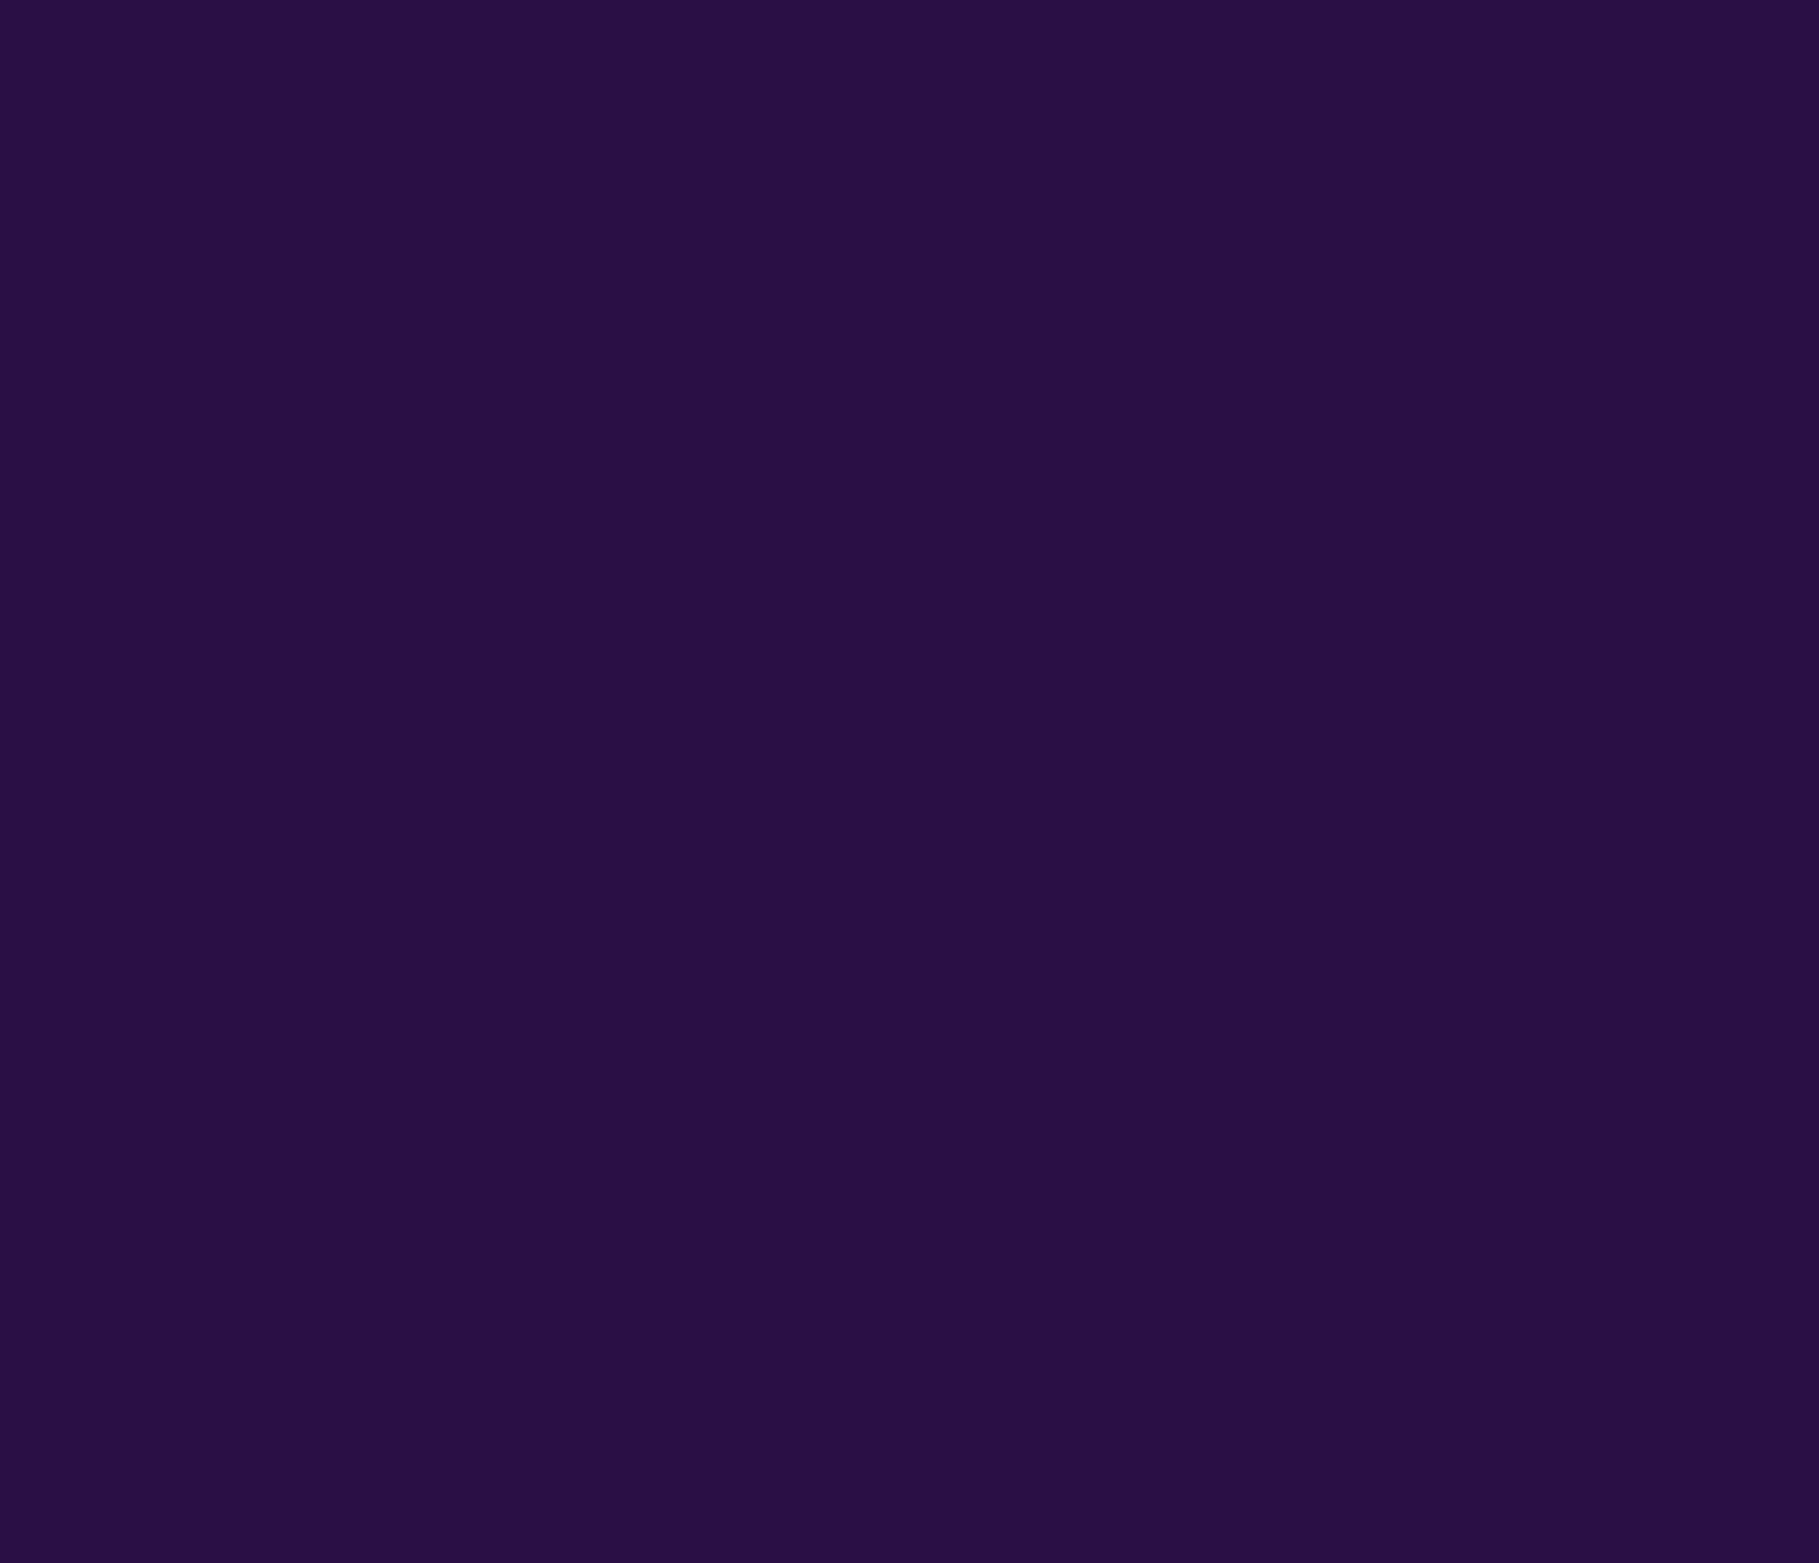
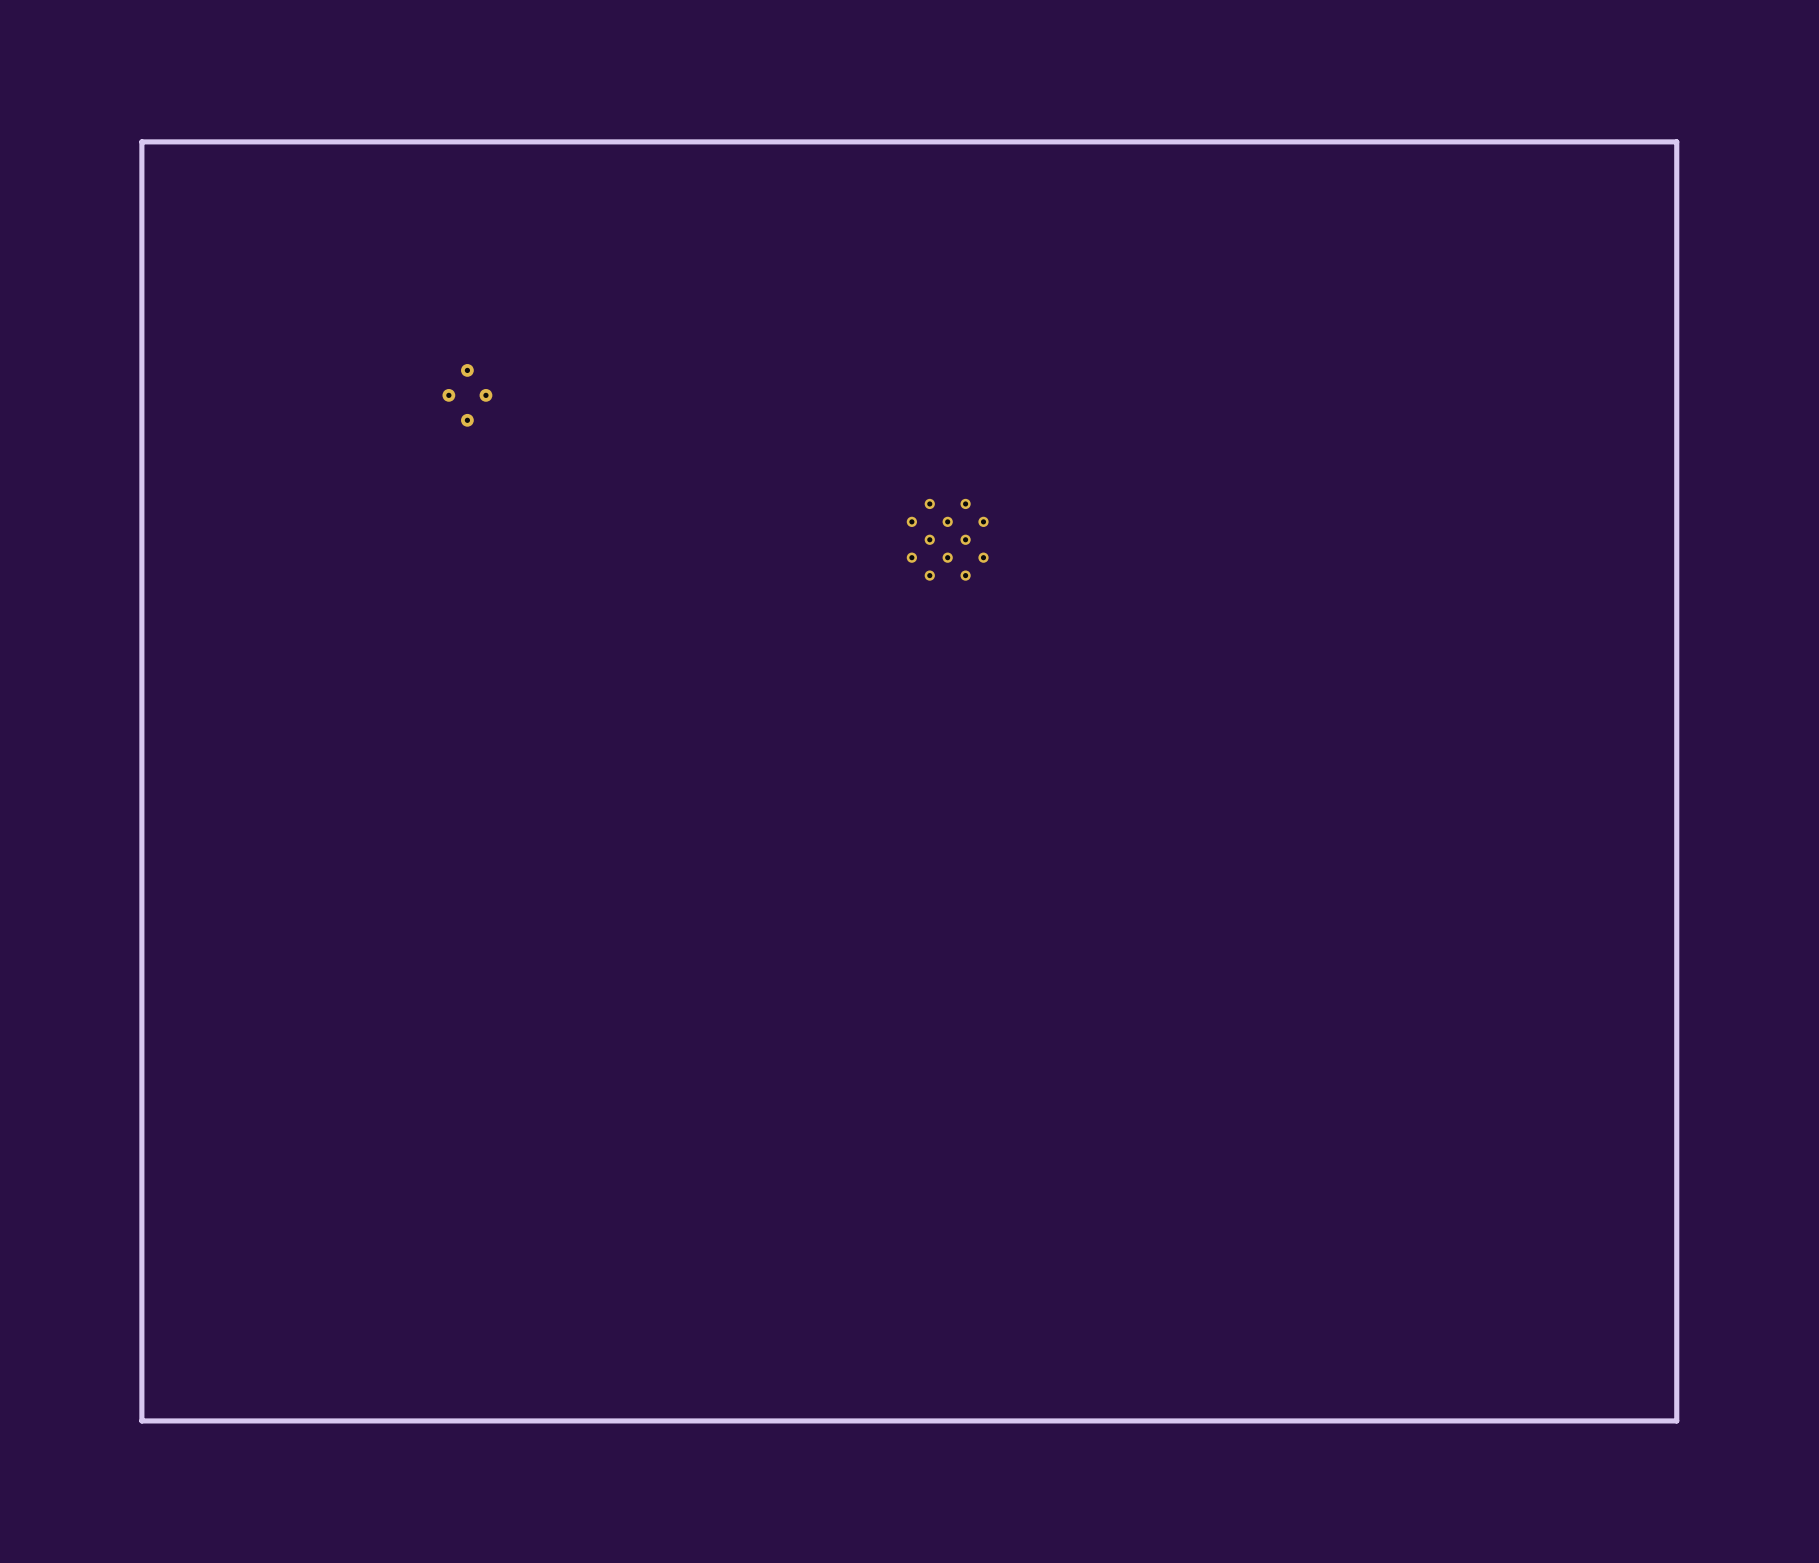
board edge: none -> (1676, 141) (141, 141) (141, 1420) (1676, 1420) (1676, 141)
part: none -> (467, 395)
part: none -> (947, 539)

